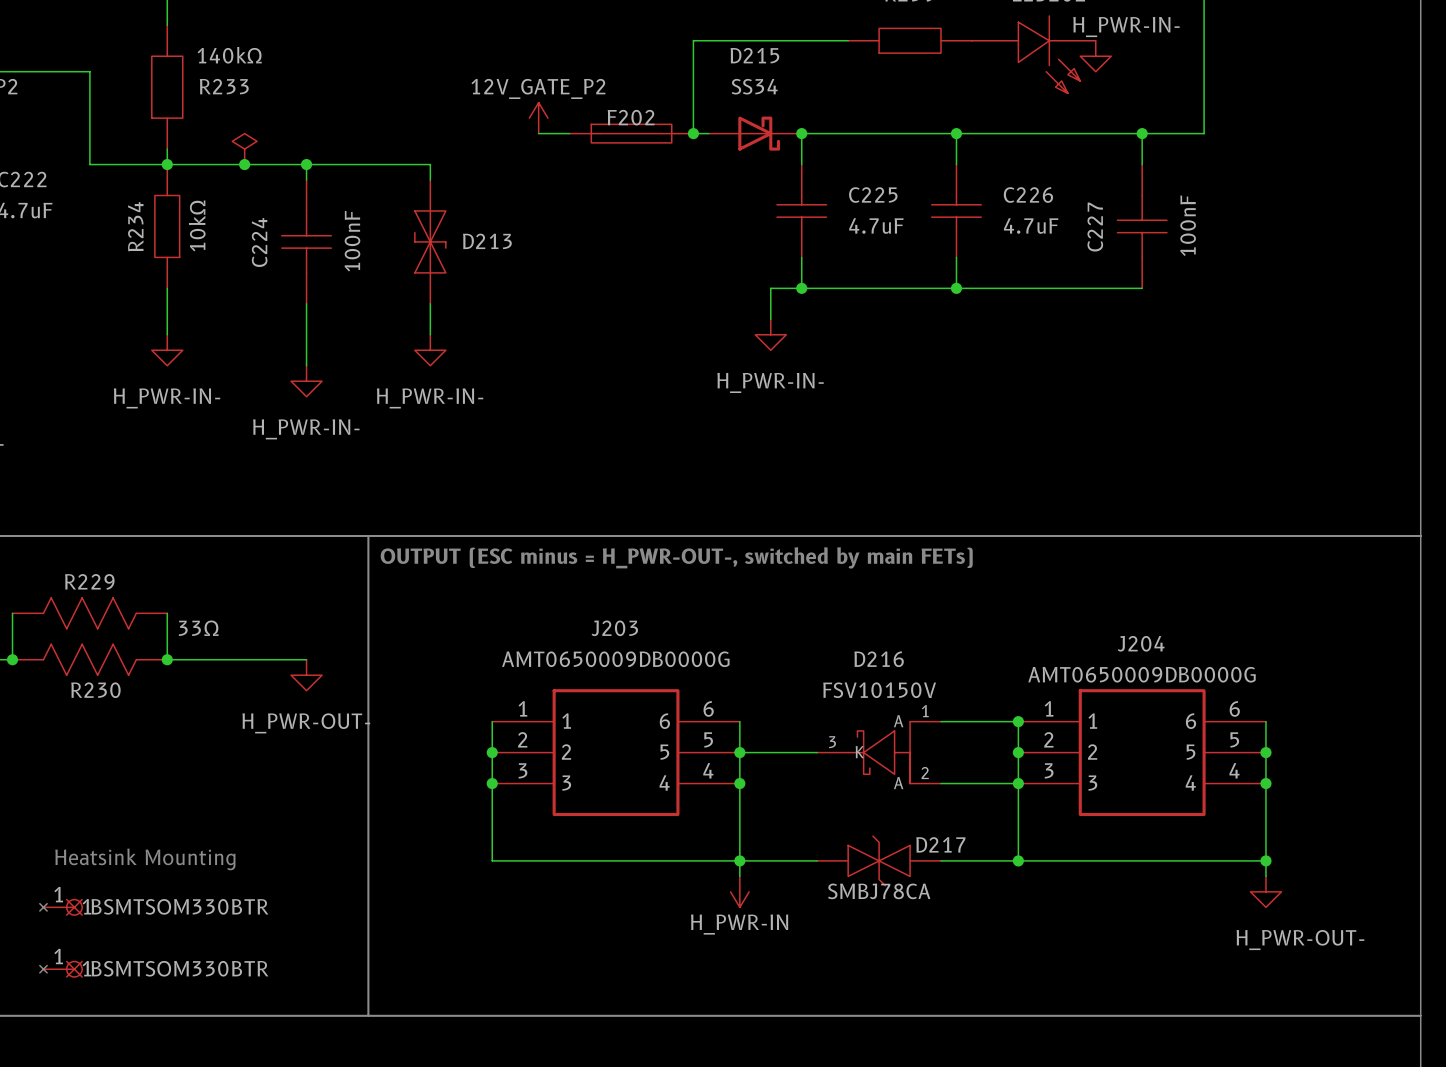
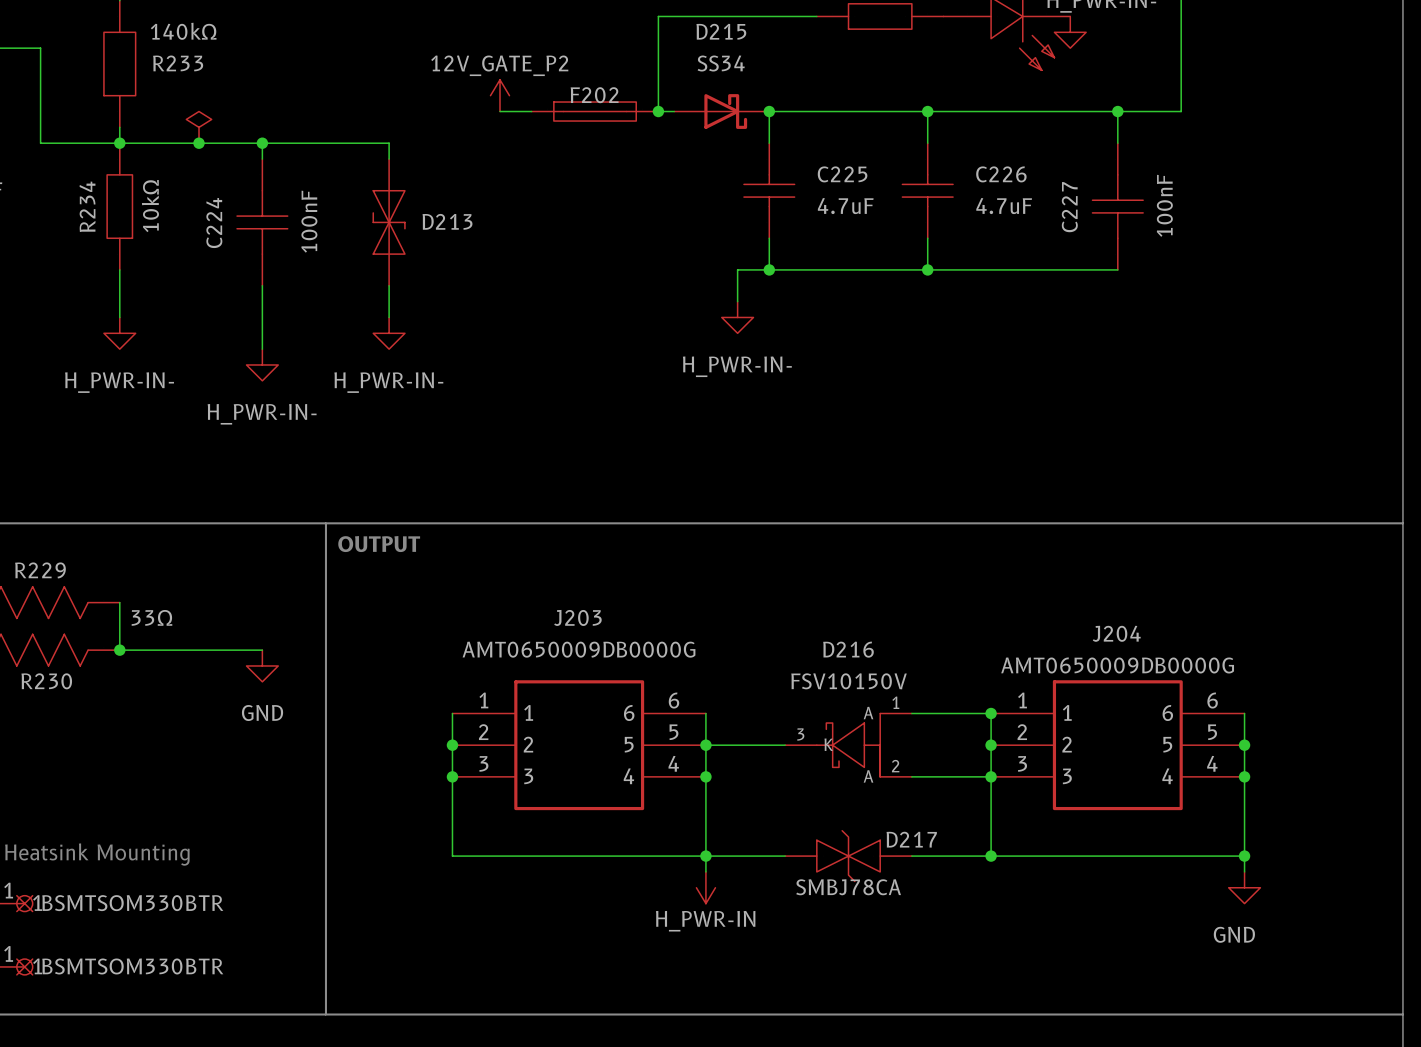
text: OUTPUT (ESC minus = H_PWR-OUT-, switched by main FETs) (676, 557) -> OUTPUT (379, 544)
power symbol: H_PWR-OUT- (306, 675) -> GND (262, 665)
power symbol: H_PWR-OUT- (1265, 891) -> GND (1244, 887)

